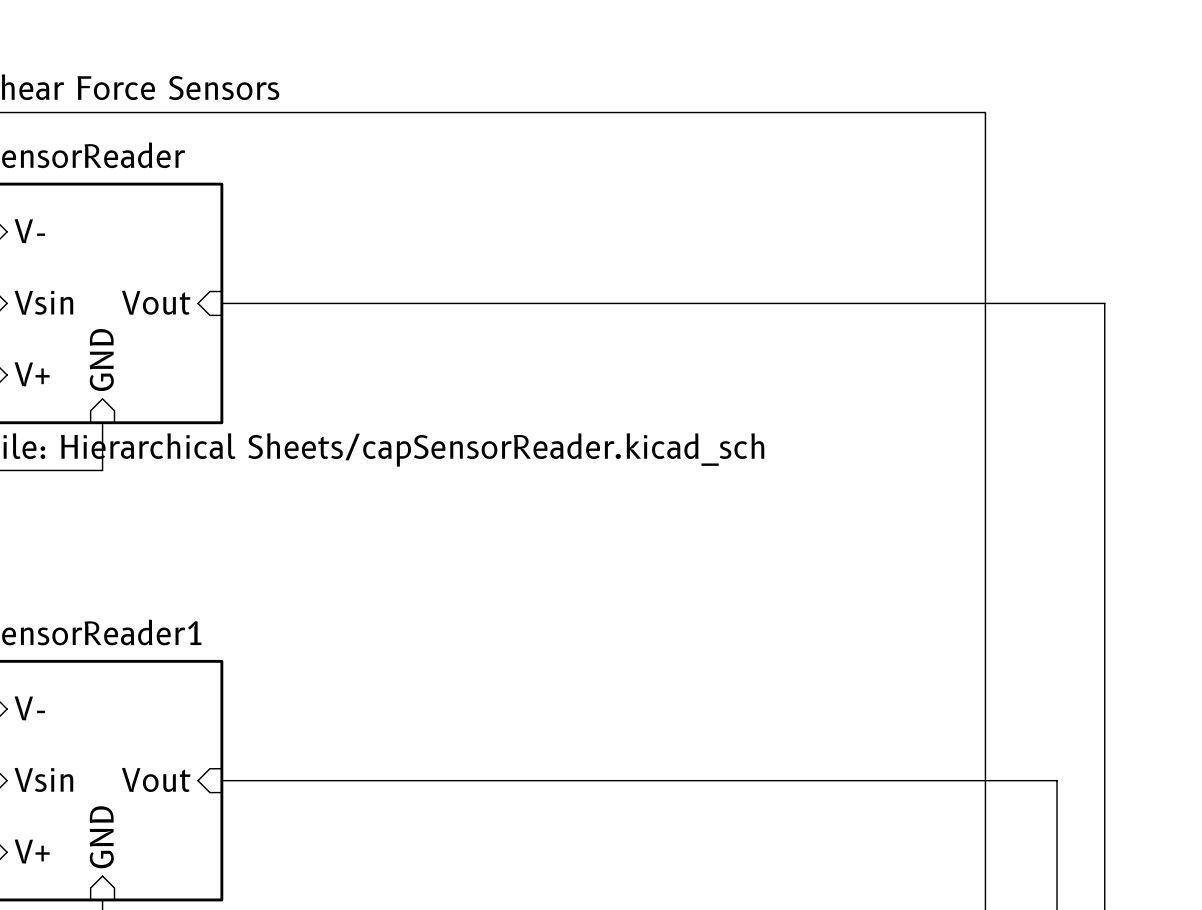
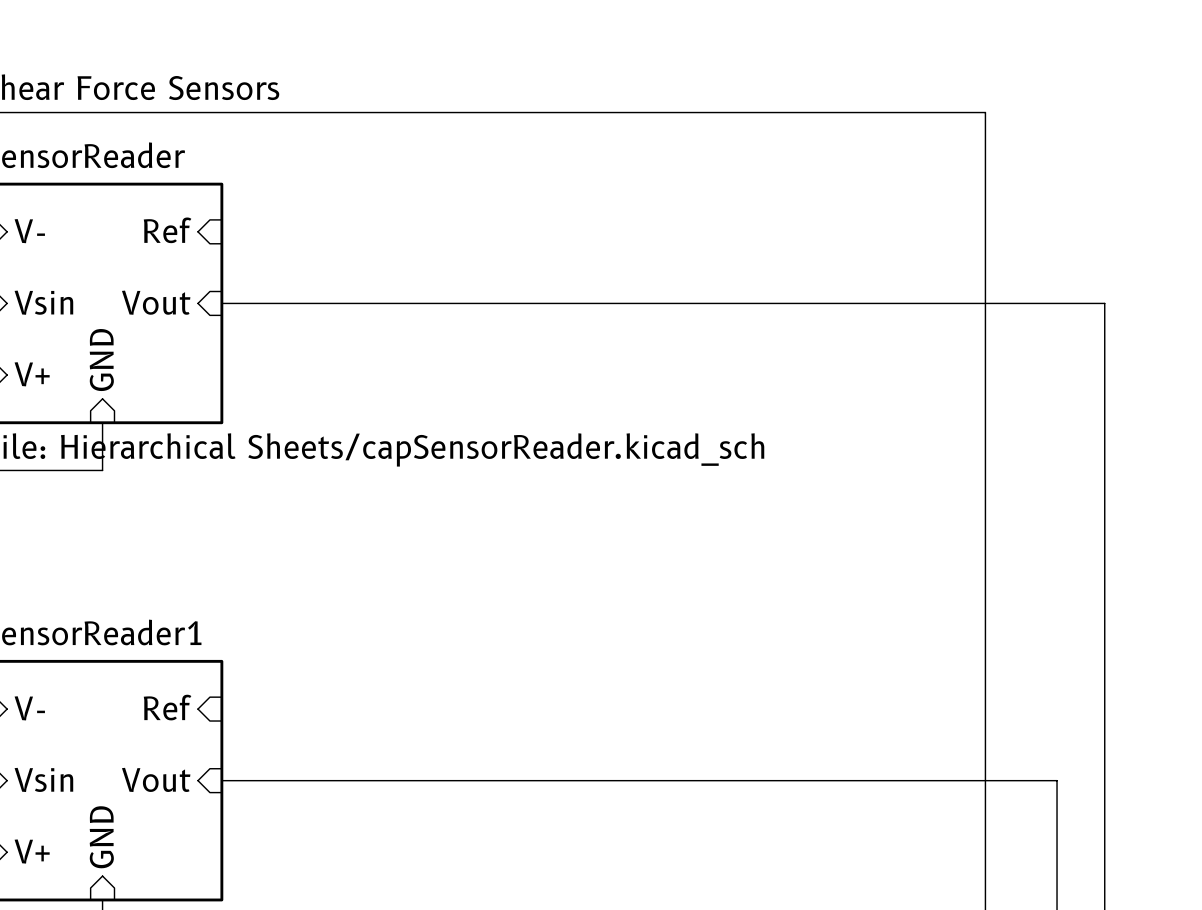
sheet pin: none -> Ref (167, 230)
sheet pin: none -> Ref (167, 707)

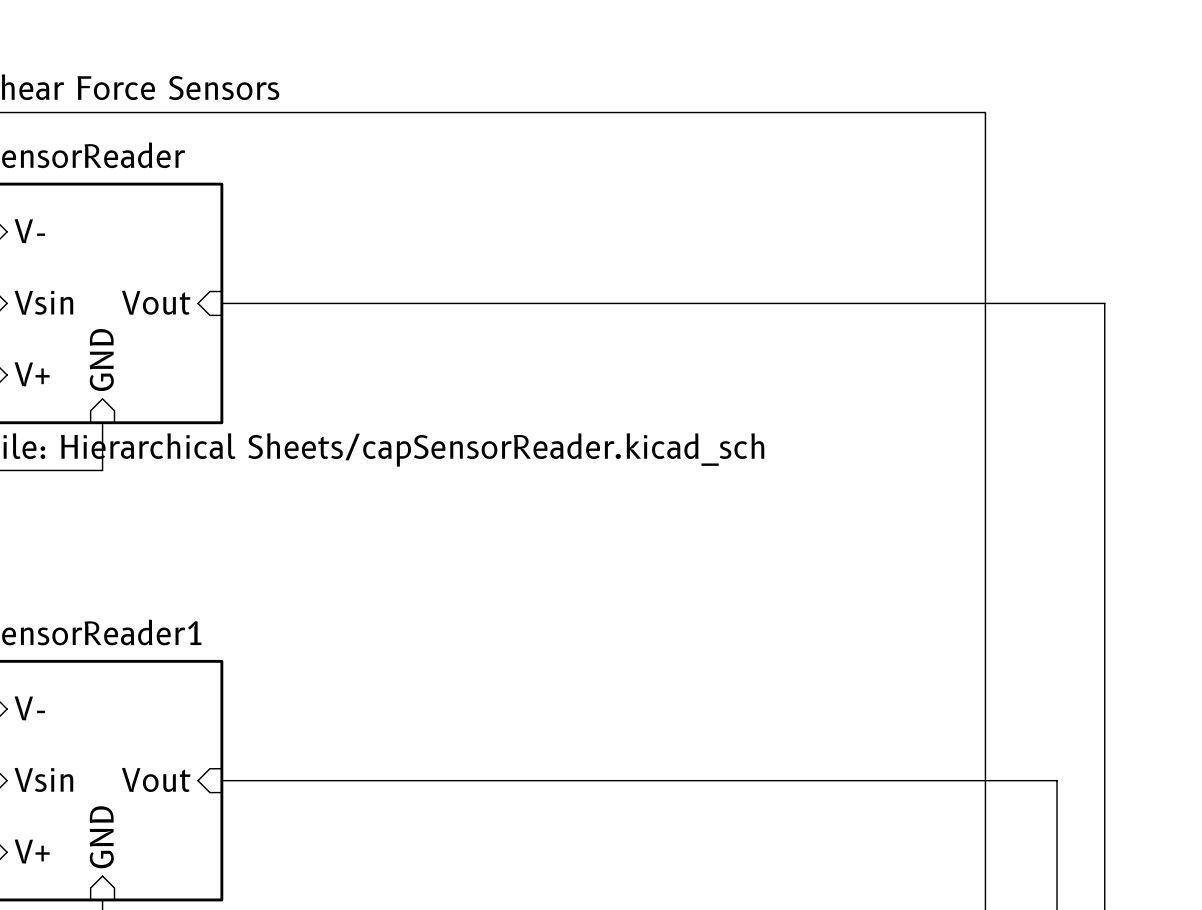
sheet pin: Ref (167, 230) -> none
sheet pin: Ref (167, 707) -> none

